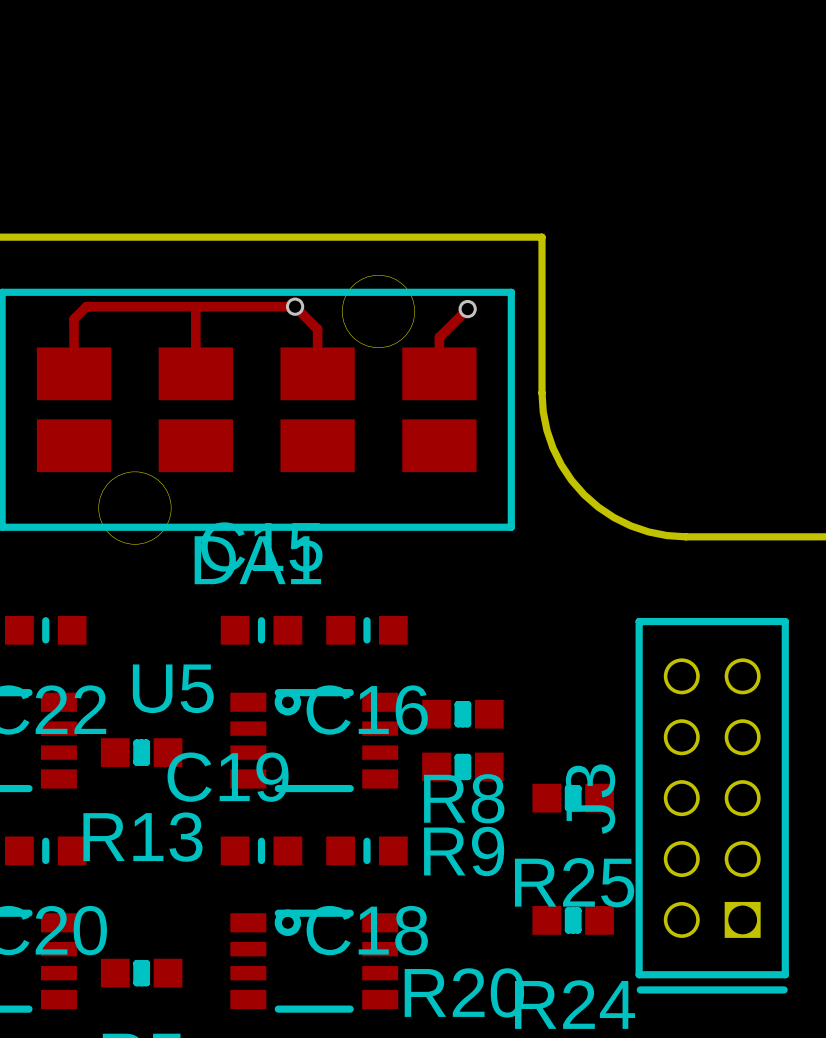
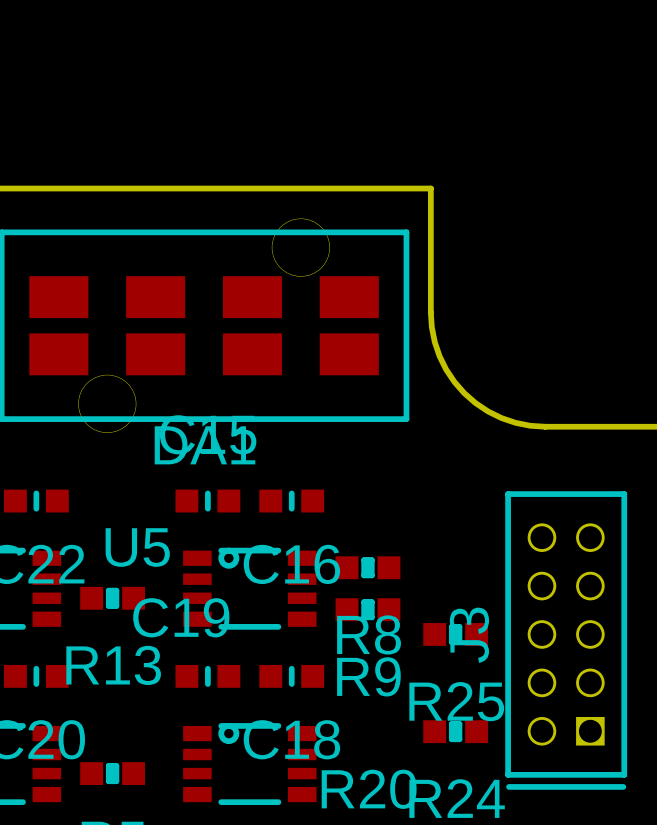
track: (196, 306) (195, 373) -> none
via: (295, 306) -> none
track: (467, 309) (439, 337) (439, 373) -> none
via: (467, 309) -> none
track: (74, 373) (74, 319) (86, 306) (295, 306) (317, 329) (317, 373) -> none

